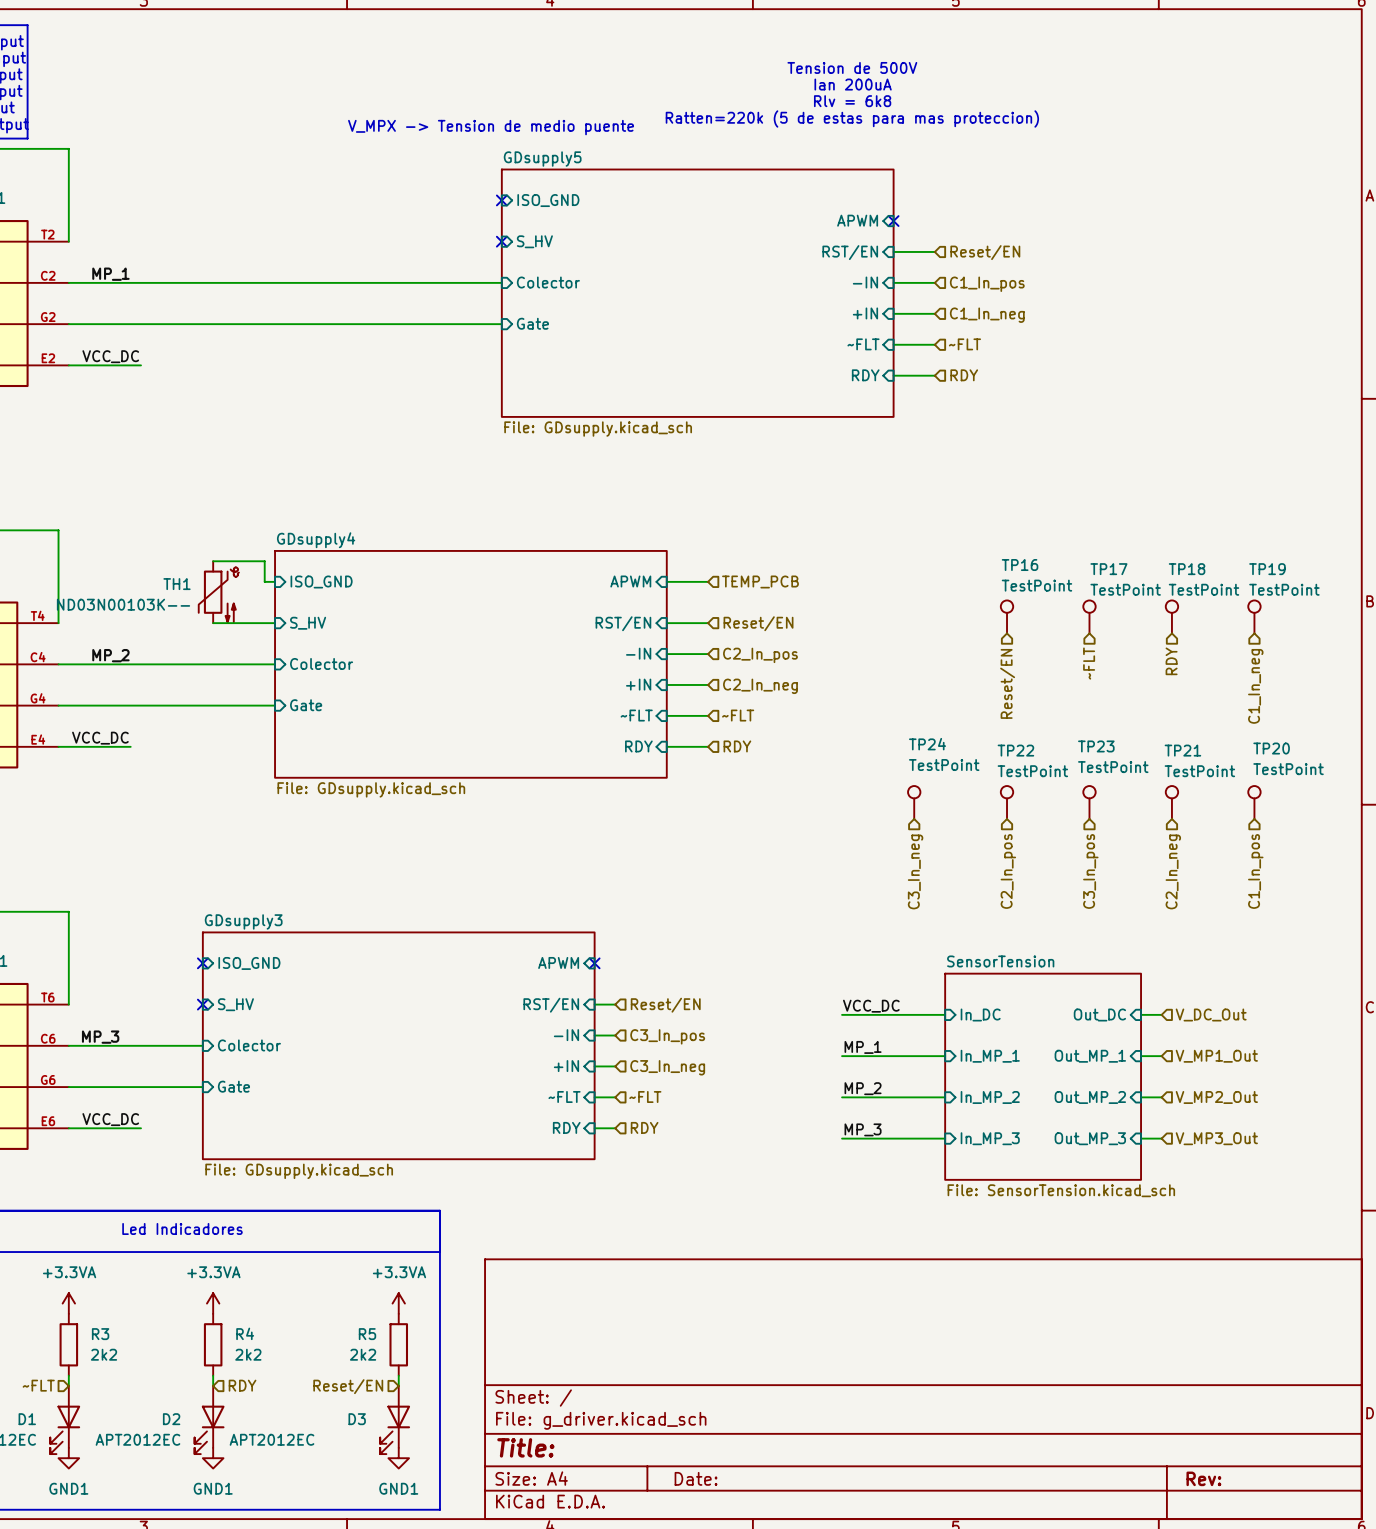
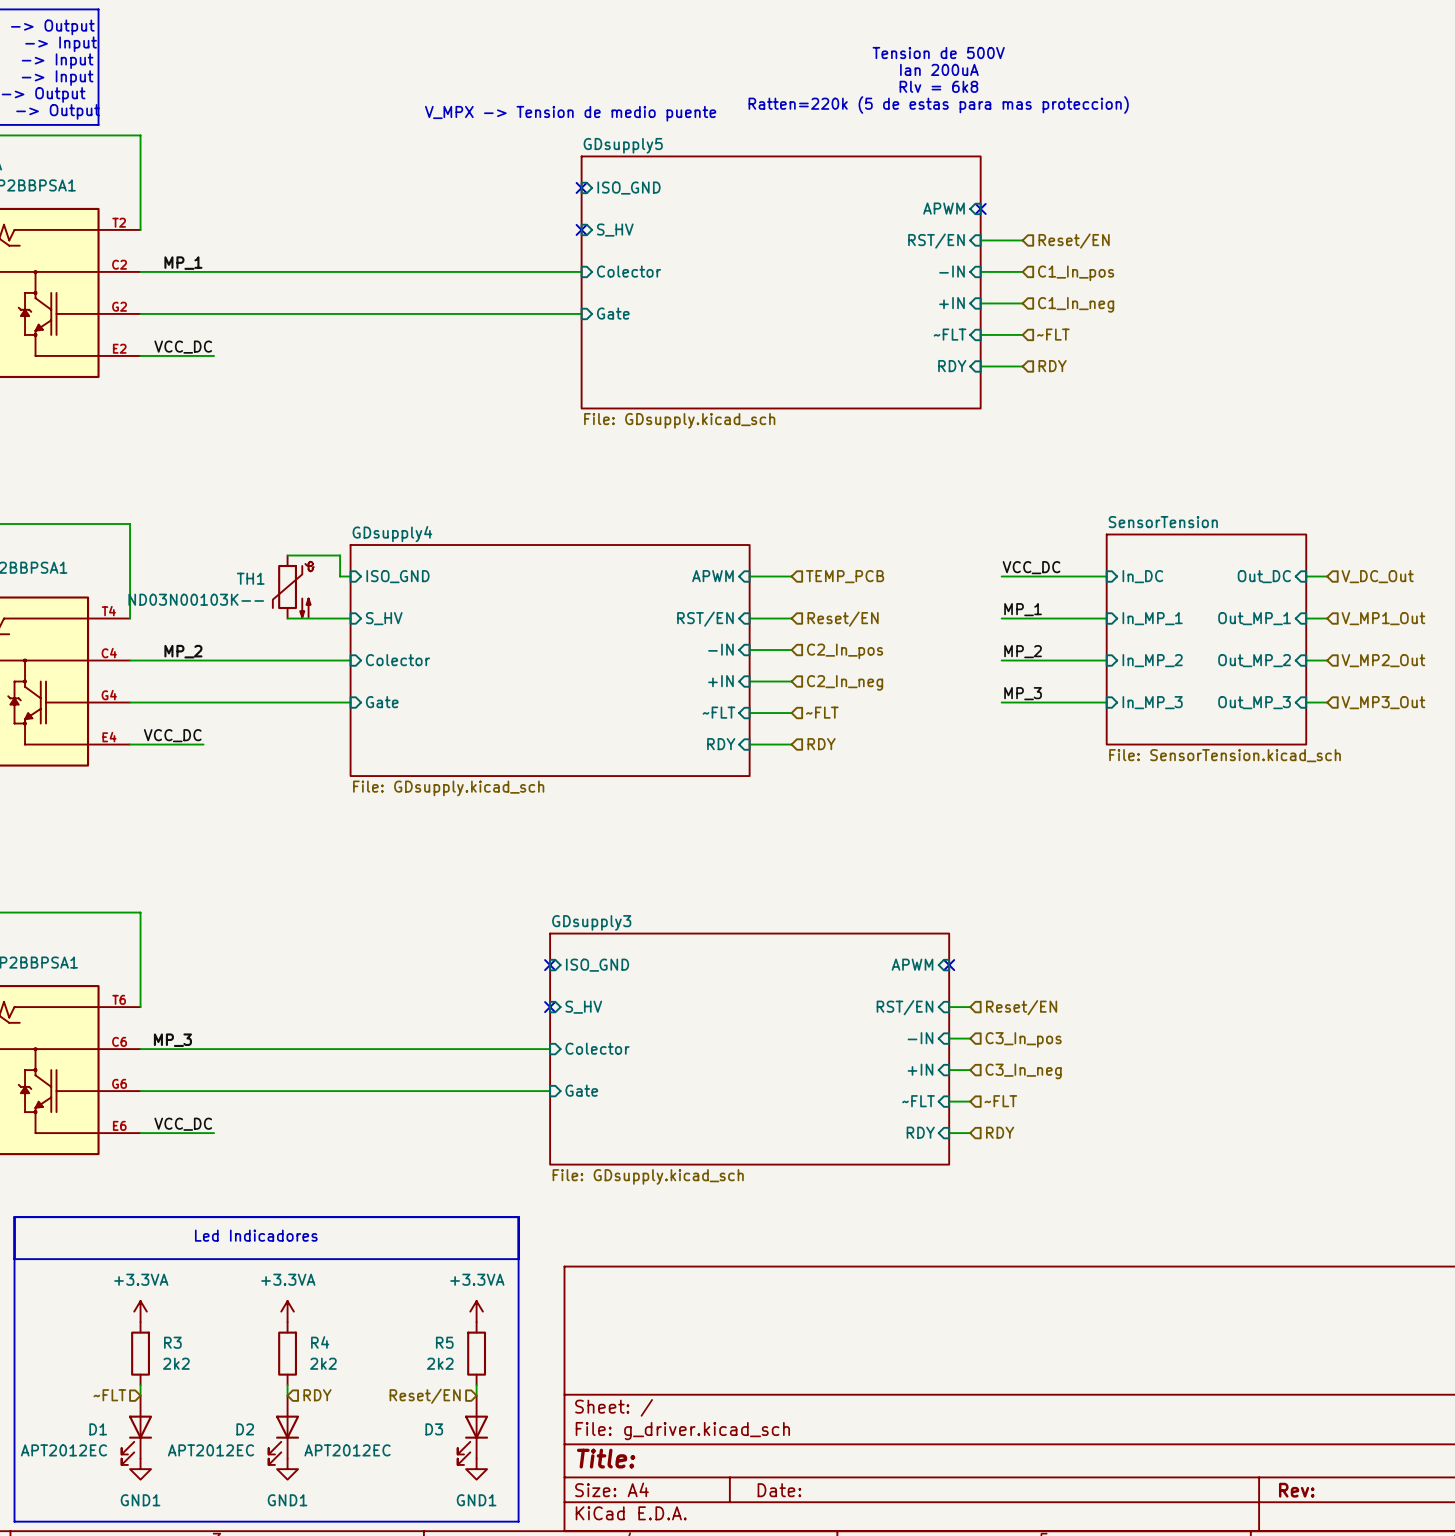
label: none -> VCC_DC (1031, 567)
wire: none -> (1001, 576) (1106, 576)
sheet pin: none -> In_DC (1142, 576)
sheet pin: none -> Out_DC (1264, 576)
wire: none -> (1306, 576) (1327, 576)
hierarchical label: none -> V_DC_Out (1377, 576)
label: none -> MP_1 (1023, 609)
TP16: TestPoint (1007, 616) -> none
TP17: TestPoint (1089, 616) -> none
TP18: TestPoint (1171, 616) -> none
TP19: TestPoint (1254, 616) -> none
wire: none -> (1001, 618) (1106, 618)
sheet pin: none -> In_MP_1 (1152, 618)
sheet pin: none -> Out_MP_1 (1254, 618)
wire: none -> (1306, 618) (1327, 618)
hierarchical label: none -> V_MP1_Out (1383, 618)
sheet SensorTension: none -> File: SensorTension.kicad_sch (1206, 639)
label: none -> MP_2 (1023, 651)
hierarchical label: RDY (1171, 661) -> none
hierarchical label: ~FLT (1089, 663) -> none
wire: none -> (1001, 660) (1106, 660)
sheet pin: none -> In_MP_2 (1152, 660)
sheet pin: none -> Out_MP_2 (1254, 660)
wire: none -> (1306, 660) (1327, 660)
hierarchical label: none -> V_MP2_Out (1383, 660)
hierarchical label: Reset/EN (1007, 683) -> none
hierarchical label: C1_In_neg (1255, 686) -> none
label: none -> MP_3 (1023, 693)
wire: none -> (1001, 702) (1106, 702)
sheet pin: none -> In_MP_3 (1152, 702)
sheet pin: none -> Out_MP_3 (1254, 702)
wire: none -> (1306, 702) (1327, 702)
hierarchical label: none -> V_MP3_Out (1383, 702)
TP24: TestPoint (914, 802) -> none
TP22: TestPoint (1007, 802) -> none
TP23: TestPoint (1089, 802) -> none
TP21: TestPoint (1171, 802) -> none
TP20: TestPoint (1254, 802) -> none
hierarchical label: C3_In_neg (915, 871) -> none
hierarchical label: C2_In_pos (1008, 871) -> none
hierarchical label: C3_In_pos (1090, 871) -> none
hierarchical label: C2_In_neg (1173, 871) -> none
hierarchical label: C1_In_pos (1255, 871) -> none
sheet pin: APWM (558, 962) -> none
sheet pin: none -> APWM (912, 964)
no-connect mark: (202, 963) -> none
sheet pin: ISO_GND (249, 963) -> none
no-connect mark: none -> (550, 965)
sheet pin: none -> ISO_GND (597, 965)
no-connect mark: (594, 963) -> none
no-connect mark: none -> (949, 965)
no-connect mark: (202, 1004) -> none
sheet pin: S_HV (235, 1004) -> none
no-connect mark: none -> (550, 1007)
sheet pin: none -> S_HV (583, 1007)
wire: (594, 1004) (615, 1004) -> none
wire: none -> (949, 1007) (970, 1007)
sheet pin: RST/EN (551, 1005) -> none
hierarchical label: Reset/EN (665, 1005) -> none
sheet pin: none -> RST/EN (905, 1007)
hierarchical label: none -> Reset/EN (1021, 1007)
label: VCC_DC (871, 1006) -> none
wire: (842, 1014) (945, 1014) -> none
wire: (1141, 1014) (1161, 1014) -> none
sheet pin: In_DC (980, 1015) -> none
sheet pin: Out_DC (1099, 1015) -> none
hierarchical label: V_DC_Out (1211, 1015) -> none
sheet pin: -IN (566, 1035) -> none
wire: (594, 1035) (615, 1035) -> none
sheet pin: none -> -IN (920, 1038)
wire: none -> (949, 1038) (970, 1038)
hierarchical label: C3_In_pos (667, 1036) -> none
hierarchical label: none -> C3_In_pos (1023, 1039)
wire: none -> (277, 1049) (550, 1049)
sheet pin: Colector (249, 1045) -> none
sheet GDsupply3 position: (398, 1045) -> (749, 1049)
sheet pin: none -> Colector (597, 1048)
label: MP_1 (863, 1047) -> none
wire: (842, 1056) (945, 1056) -> none
sheet pin: In_MP_1 (990, 1056) -> none
sheet pin: Out_MP_1 (1090, 1056) -> none
wire: (1141, 1056) (1161, 1056) -> none
hierarchical label: V_MP1_Out (1216, 1056) -> none
sheet pin: +IN (566, 1066) -> none
wire: (594, 1066) (615, 1066) -> none
sheet pin: none -> +IN (920, 1069)
hierarchical label: C3_In_neg (667, 1067) -> none
hierarchical label: none -> C3_In_neg (1023, 1071)
sheet SensorTension: File: SensorTension.kicad_sch (1043, 1076) -> none
sheet pin: Gate (233, 1086) -> none
sheet pin: none -> Gate (581, 1090)
wire: none -> (277, 1091) (550, 1091)
label: MP_2 (863, 1088) -> none
sheet pin: ~FLT (564, 1096) -> none
hierarchical label: ~FLT (645, 1096) -> none
sheet pin: none -> ~FLT (918, 1101)
hierarchical label: none -> ~FLT (1000, 1101)
wire: (594, 1097) (615, 1097) -> none
wire: (842, 1097) (862, 1097) -> (949, 1070) (970, 1070)
wire: (883, 1097) (945, 1097) -> none
sheet pin: In_MP_2 (990, 1097) -> none
sheet pin: Out_MP_2 (1090, 1097) -> none
wire: (1141, 1097) (1161, 1097) -> none
hierarchical label: V_MP2_Out (1216, 1097) -> none
sheet pin: RDY (566, 1127) -> none
hierarchical label: RDY (644, 1127) -> none
sheet pin: none -> RDY (920, 1132)
hierarchical label: none -> RDY (1000, 1132)
wire: (594, 1128) (615, 1128) -> none
wire: none -> (949, 1133) (970, 1133)
label: MP_3 (863, 1129) -> none
wire: (842, 1138) (945, 1138) -> none
sheet pin: In_MP_3 (990, 1138) -> none
sheet pin: Out_MP_3 (1090, 1138) -> none
wire: (1141, 1138) (1161, 1138) -> none
hierarchical label: V_MP3_Out (1216, 1138) -> none

